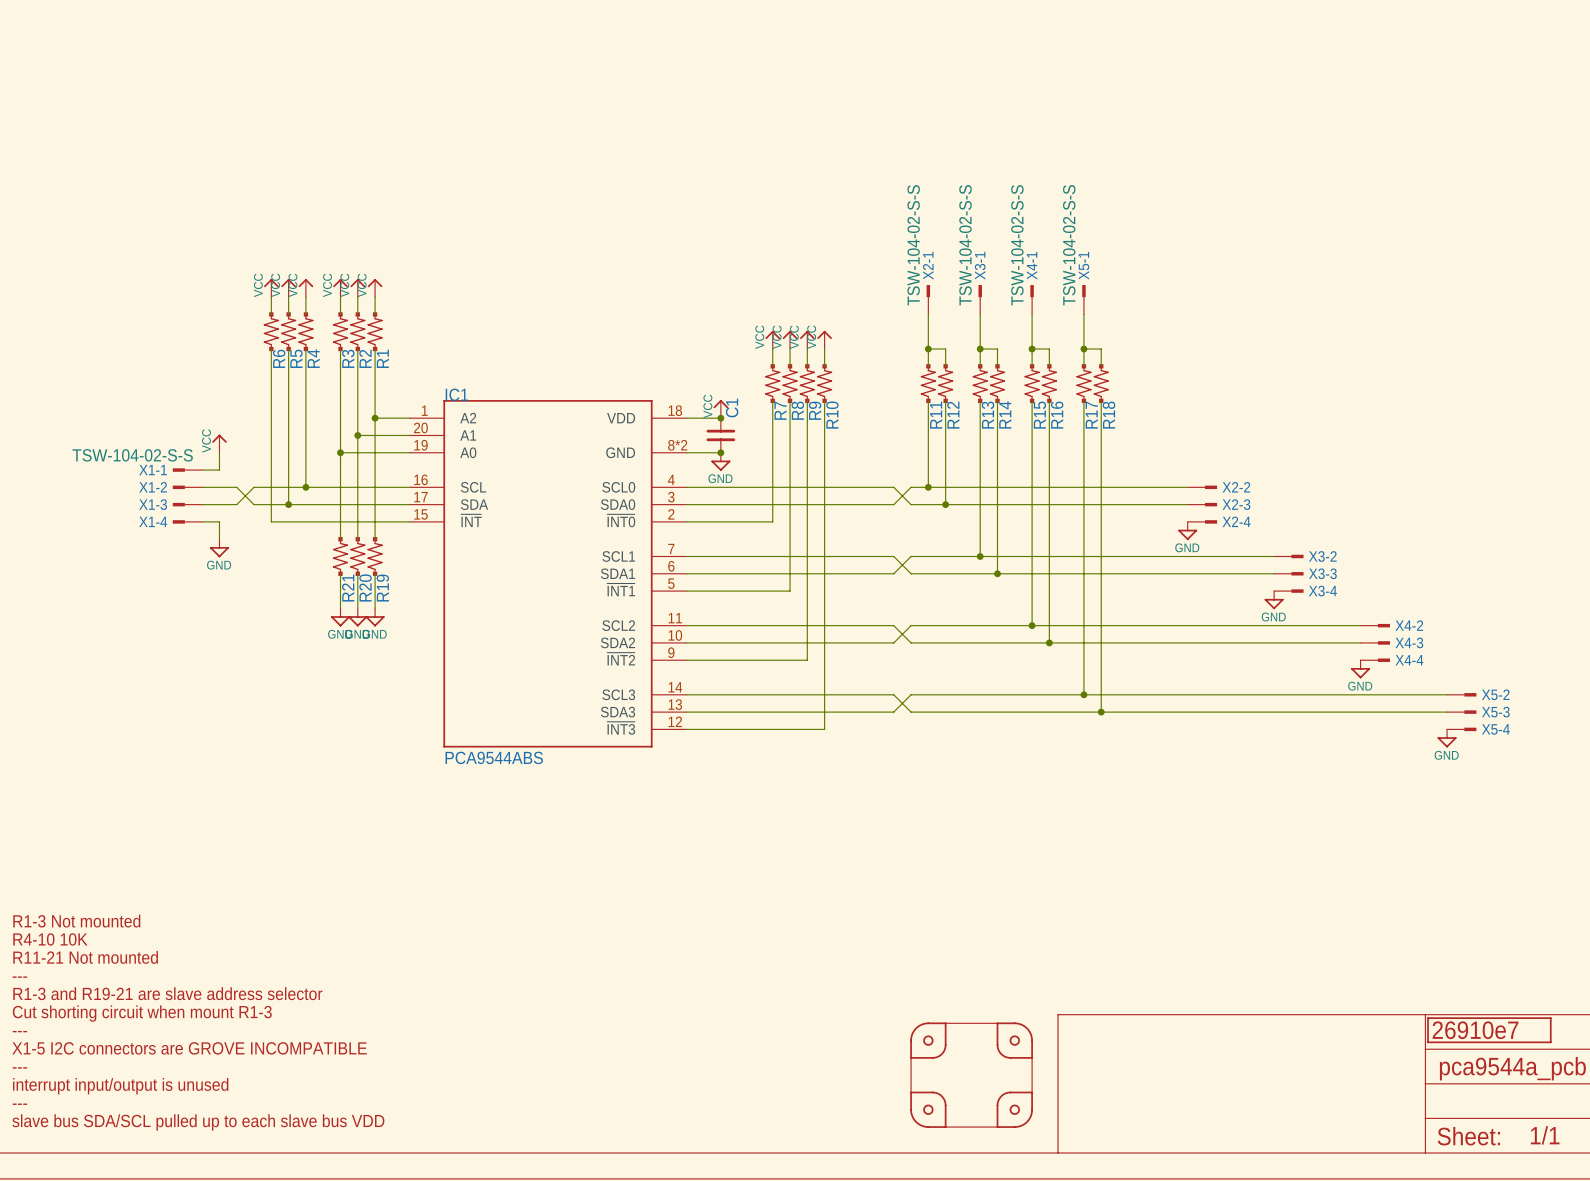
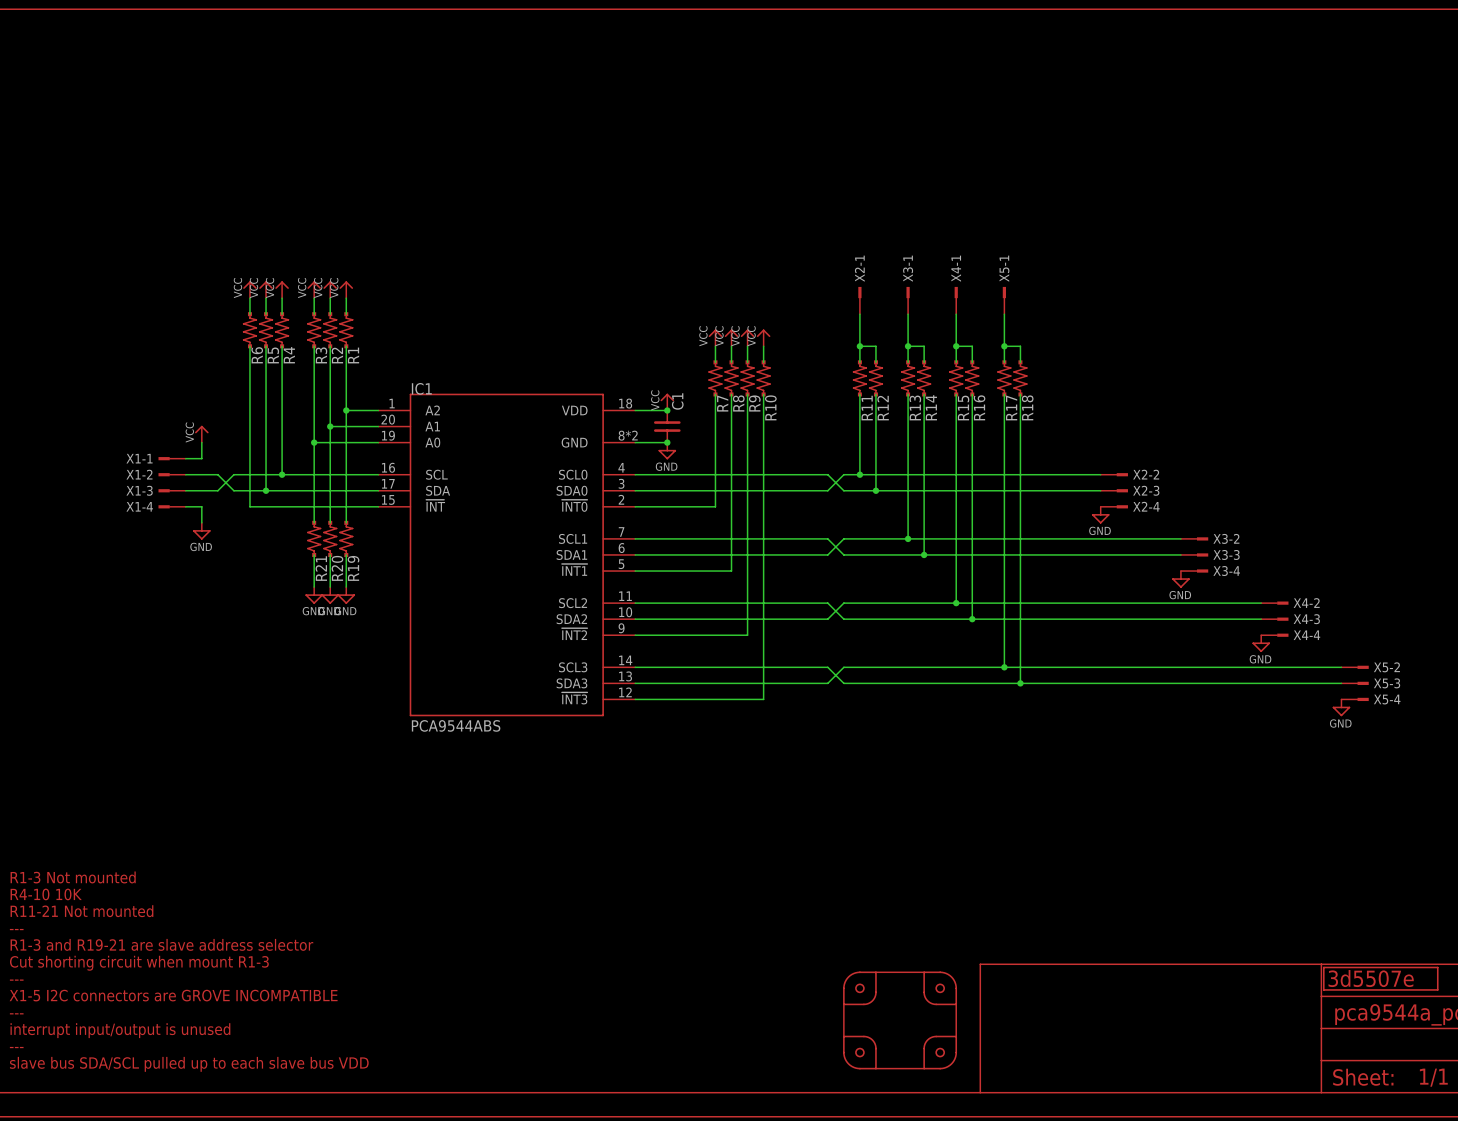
X2-1 value: TSW-104-02-S-S (913, 245) -> none
X3-1 value: TSW-104-02-S-S (965, 245) -> none
X4-1 value: TSW-104-02-S-S (1017, 245) -> none
X5-1 value: TSW-104-02-S-S (1069, 245) -> none
X1-1 value: TSW-104-02-S-S (132, 455) -> none
part value: 26910e7 (1475, 1030) -> 3d5507e (1371, 978)

